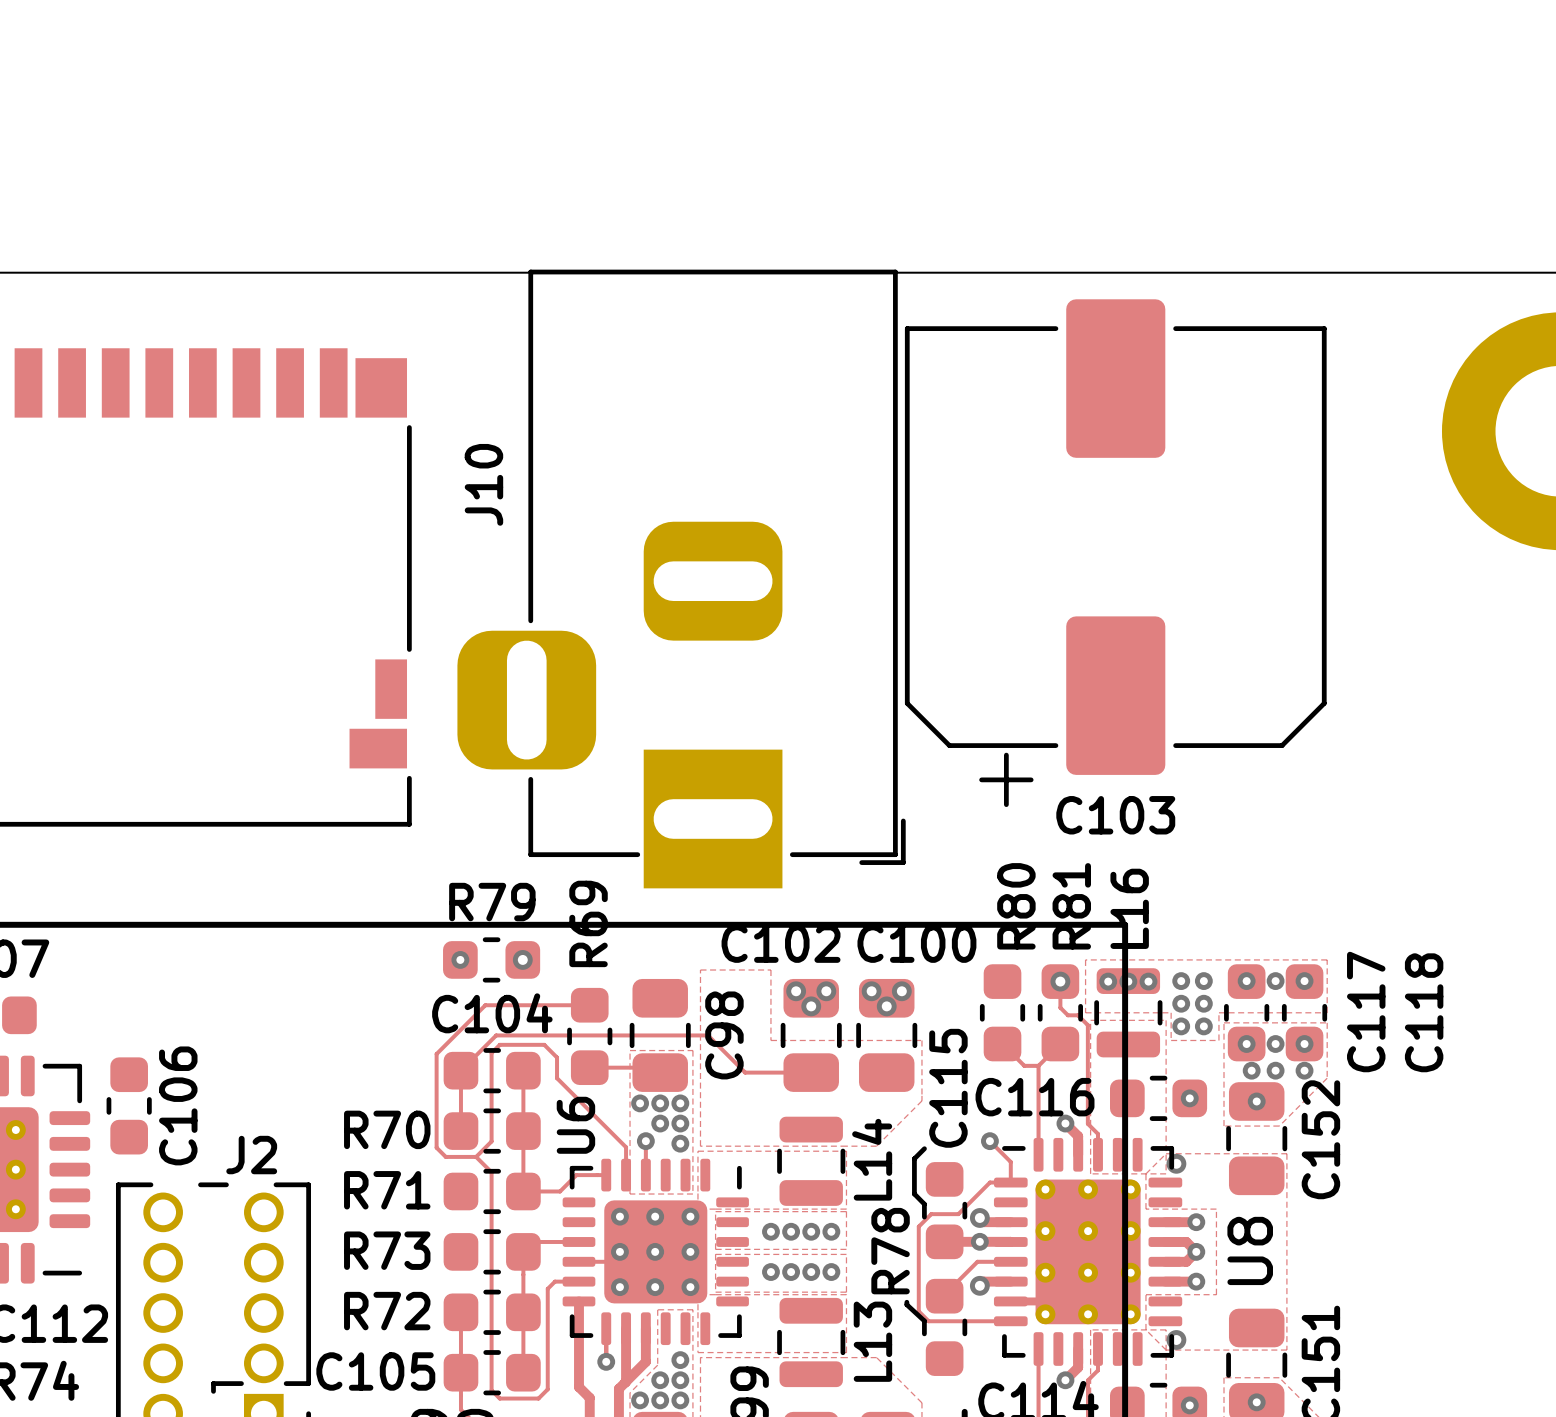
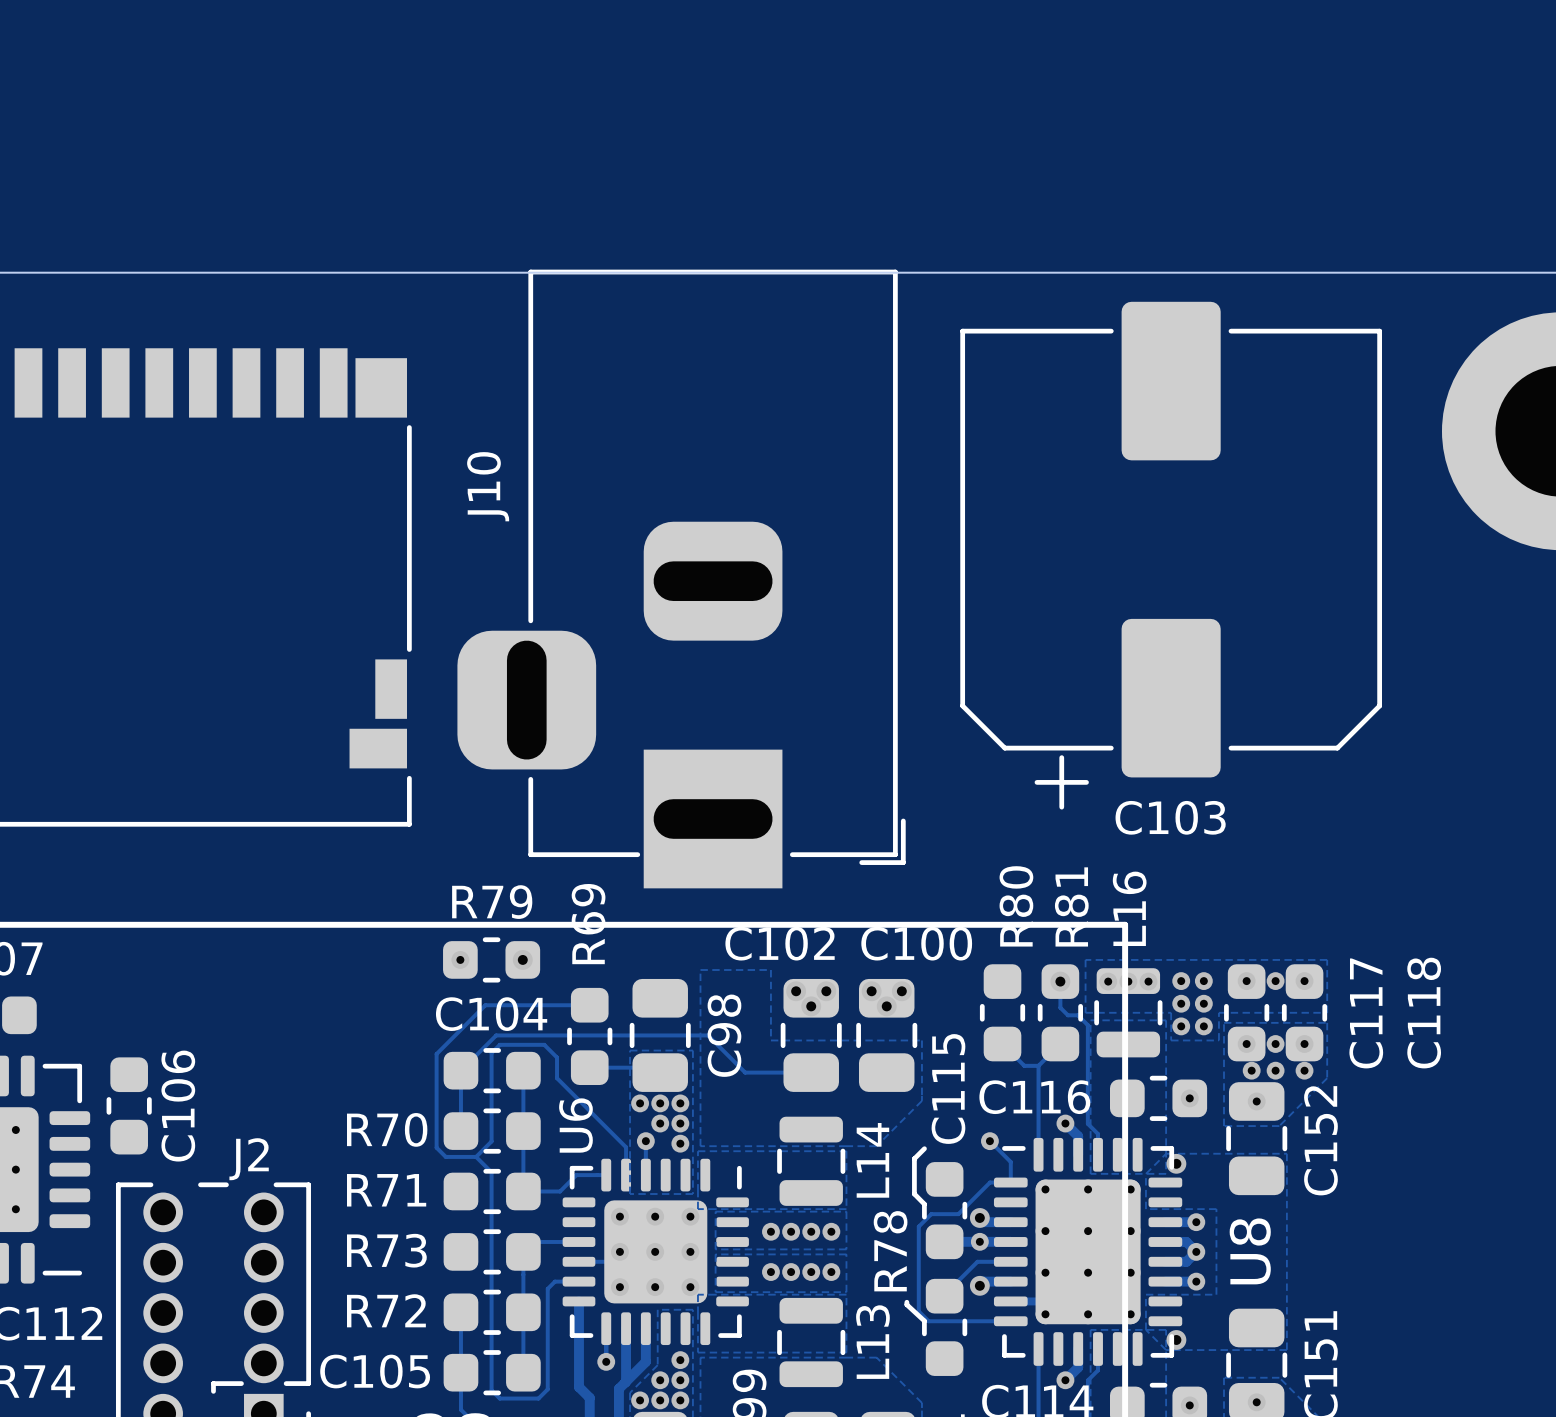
C103 position: (1115, 553) -> (1171, 555)

